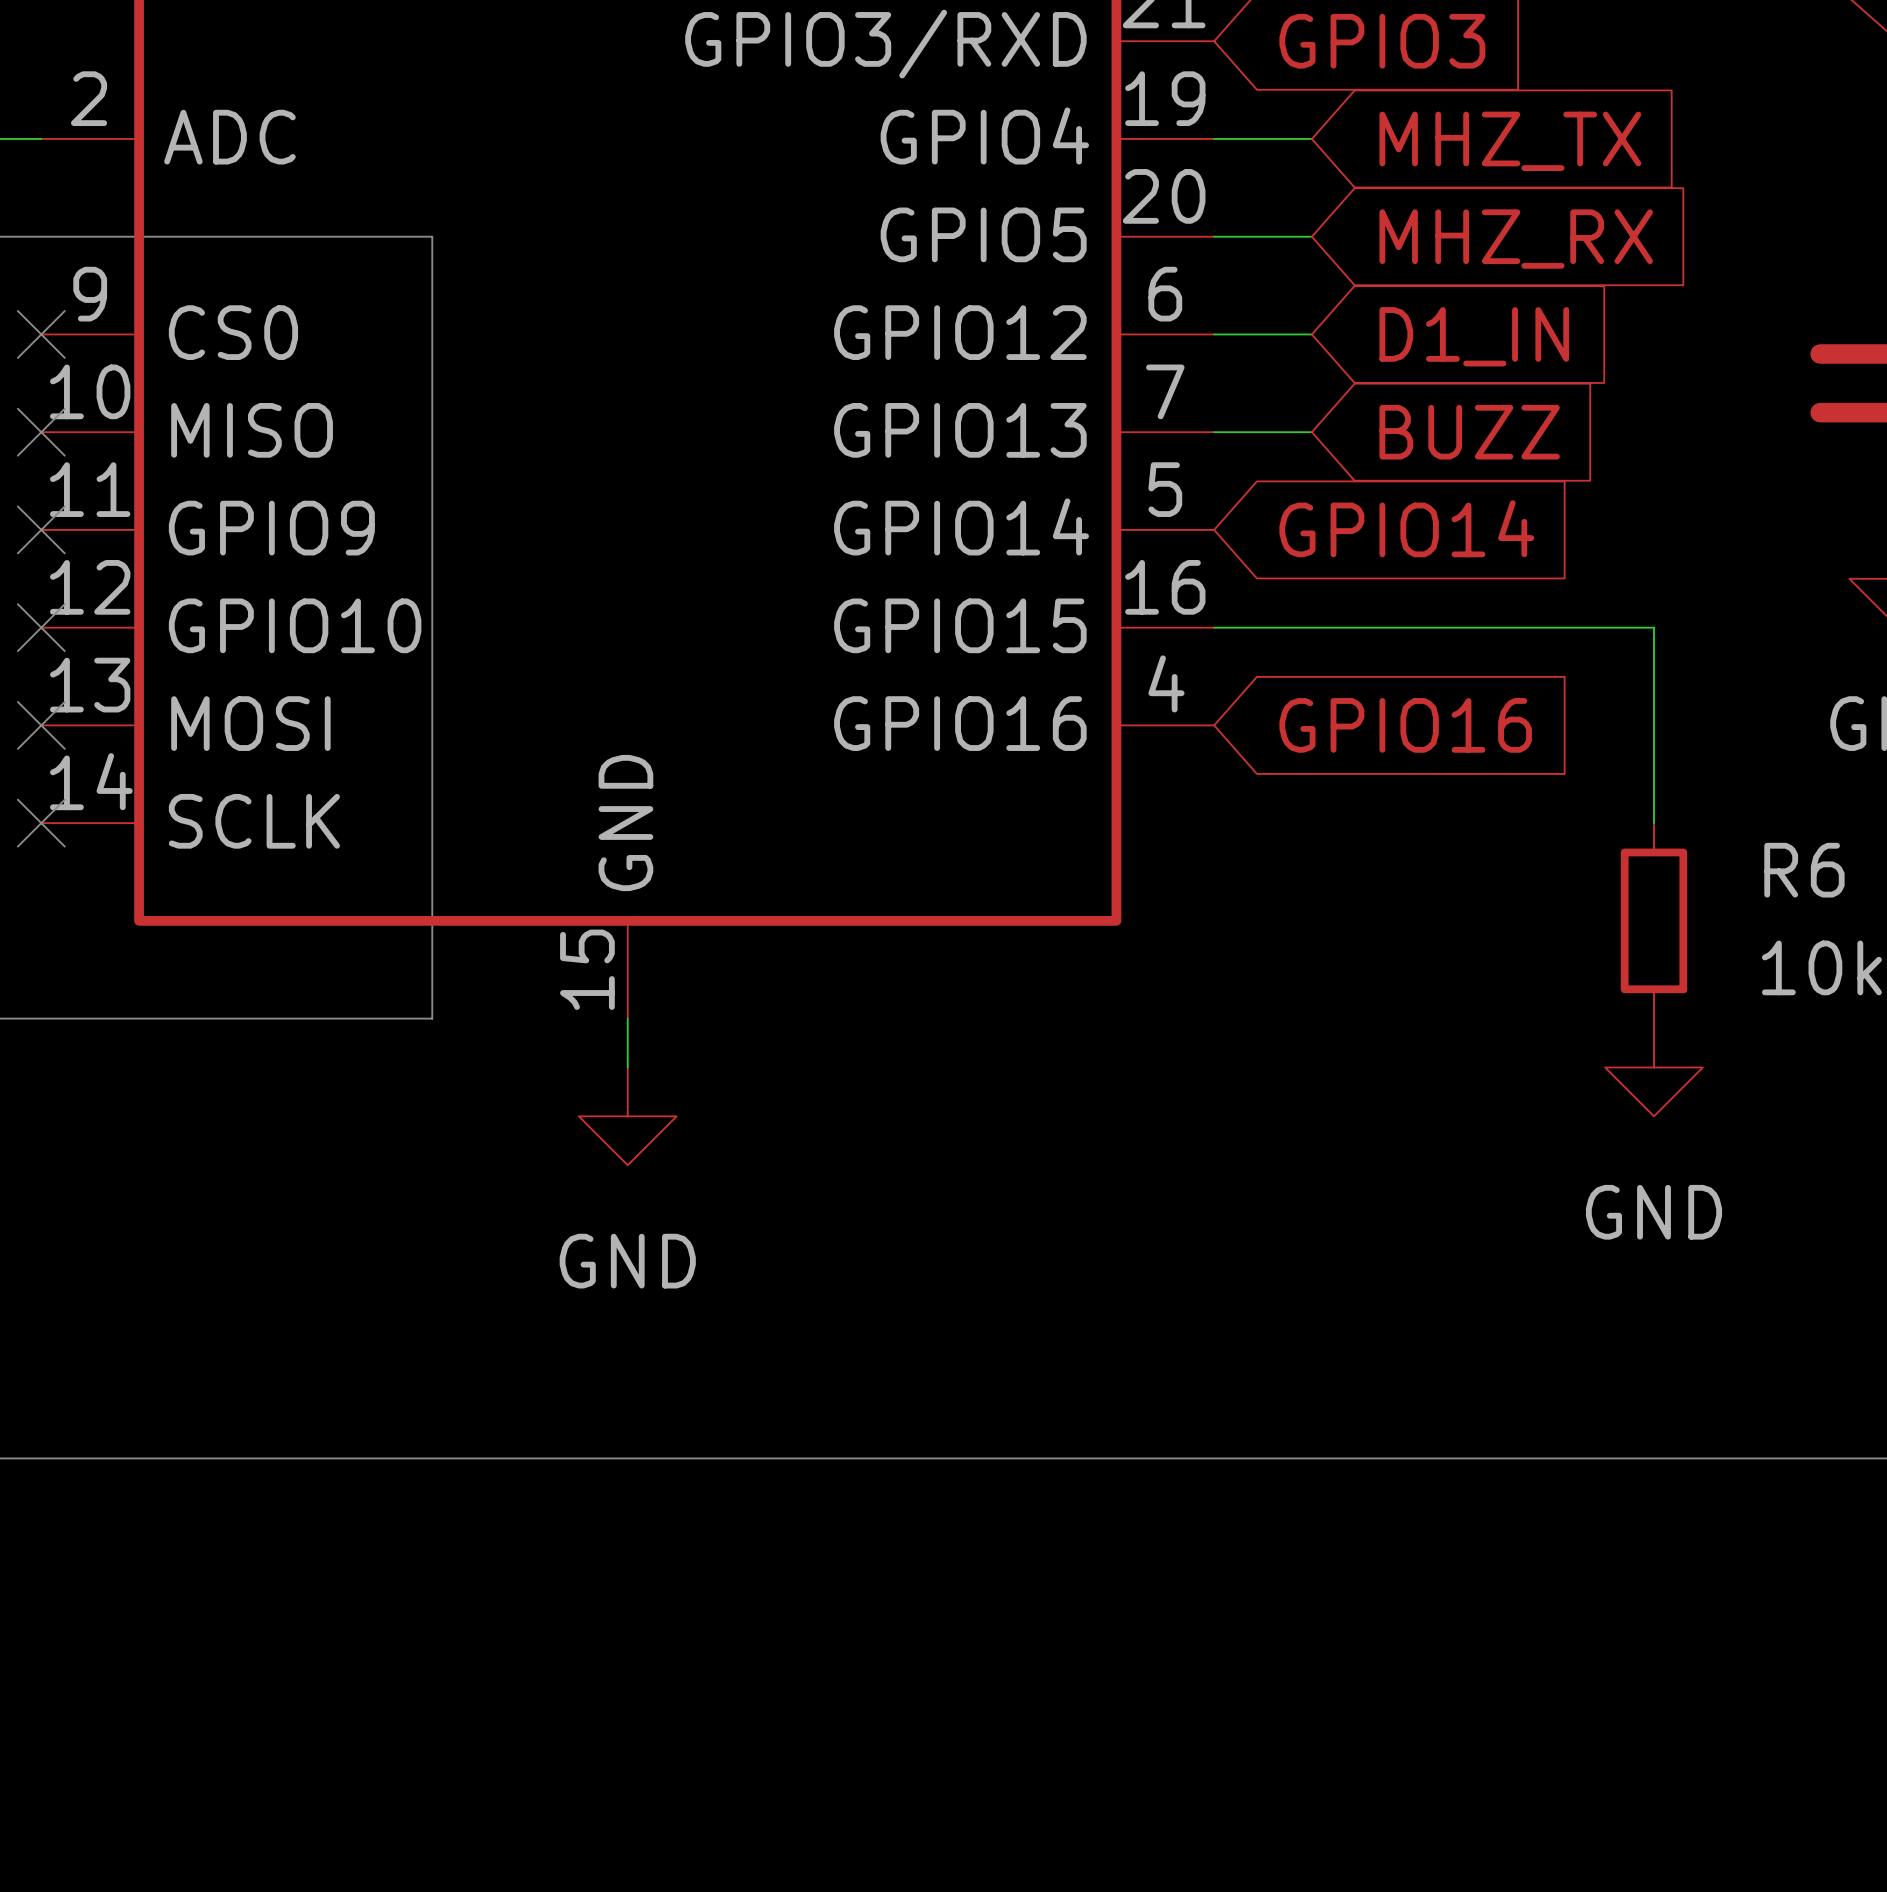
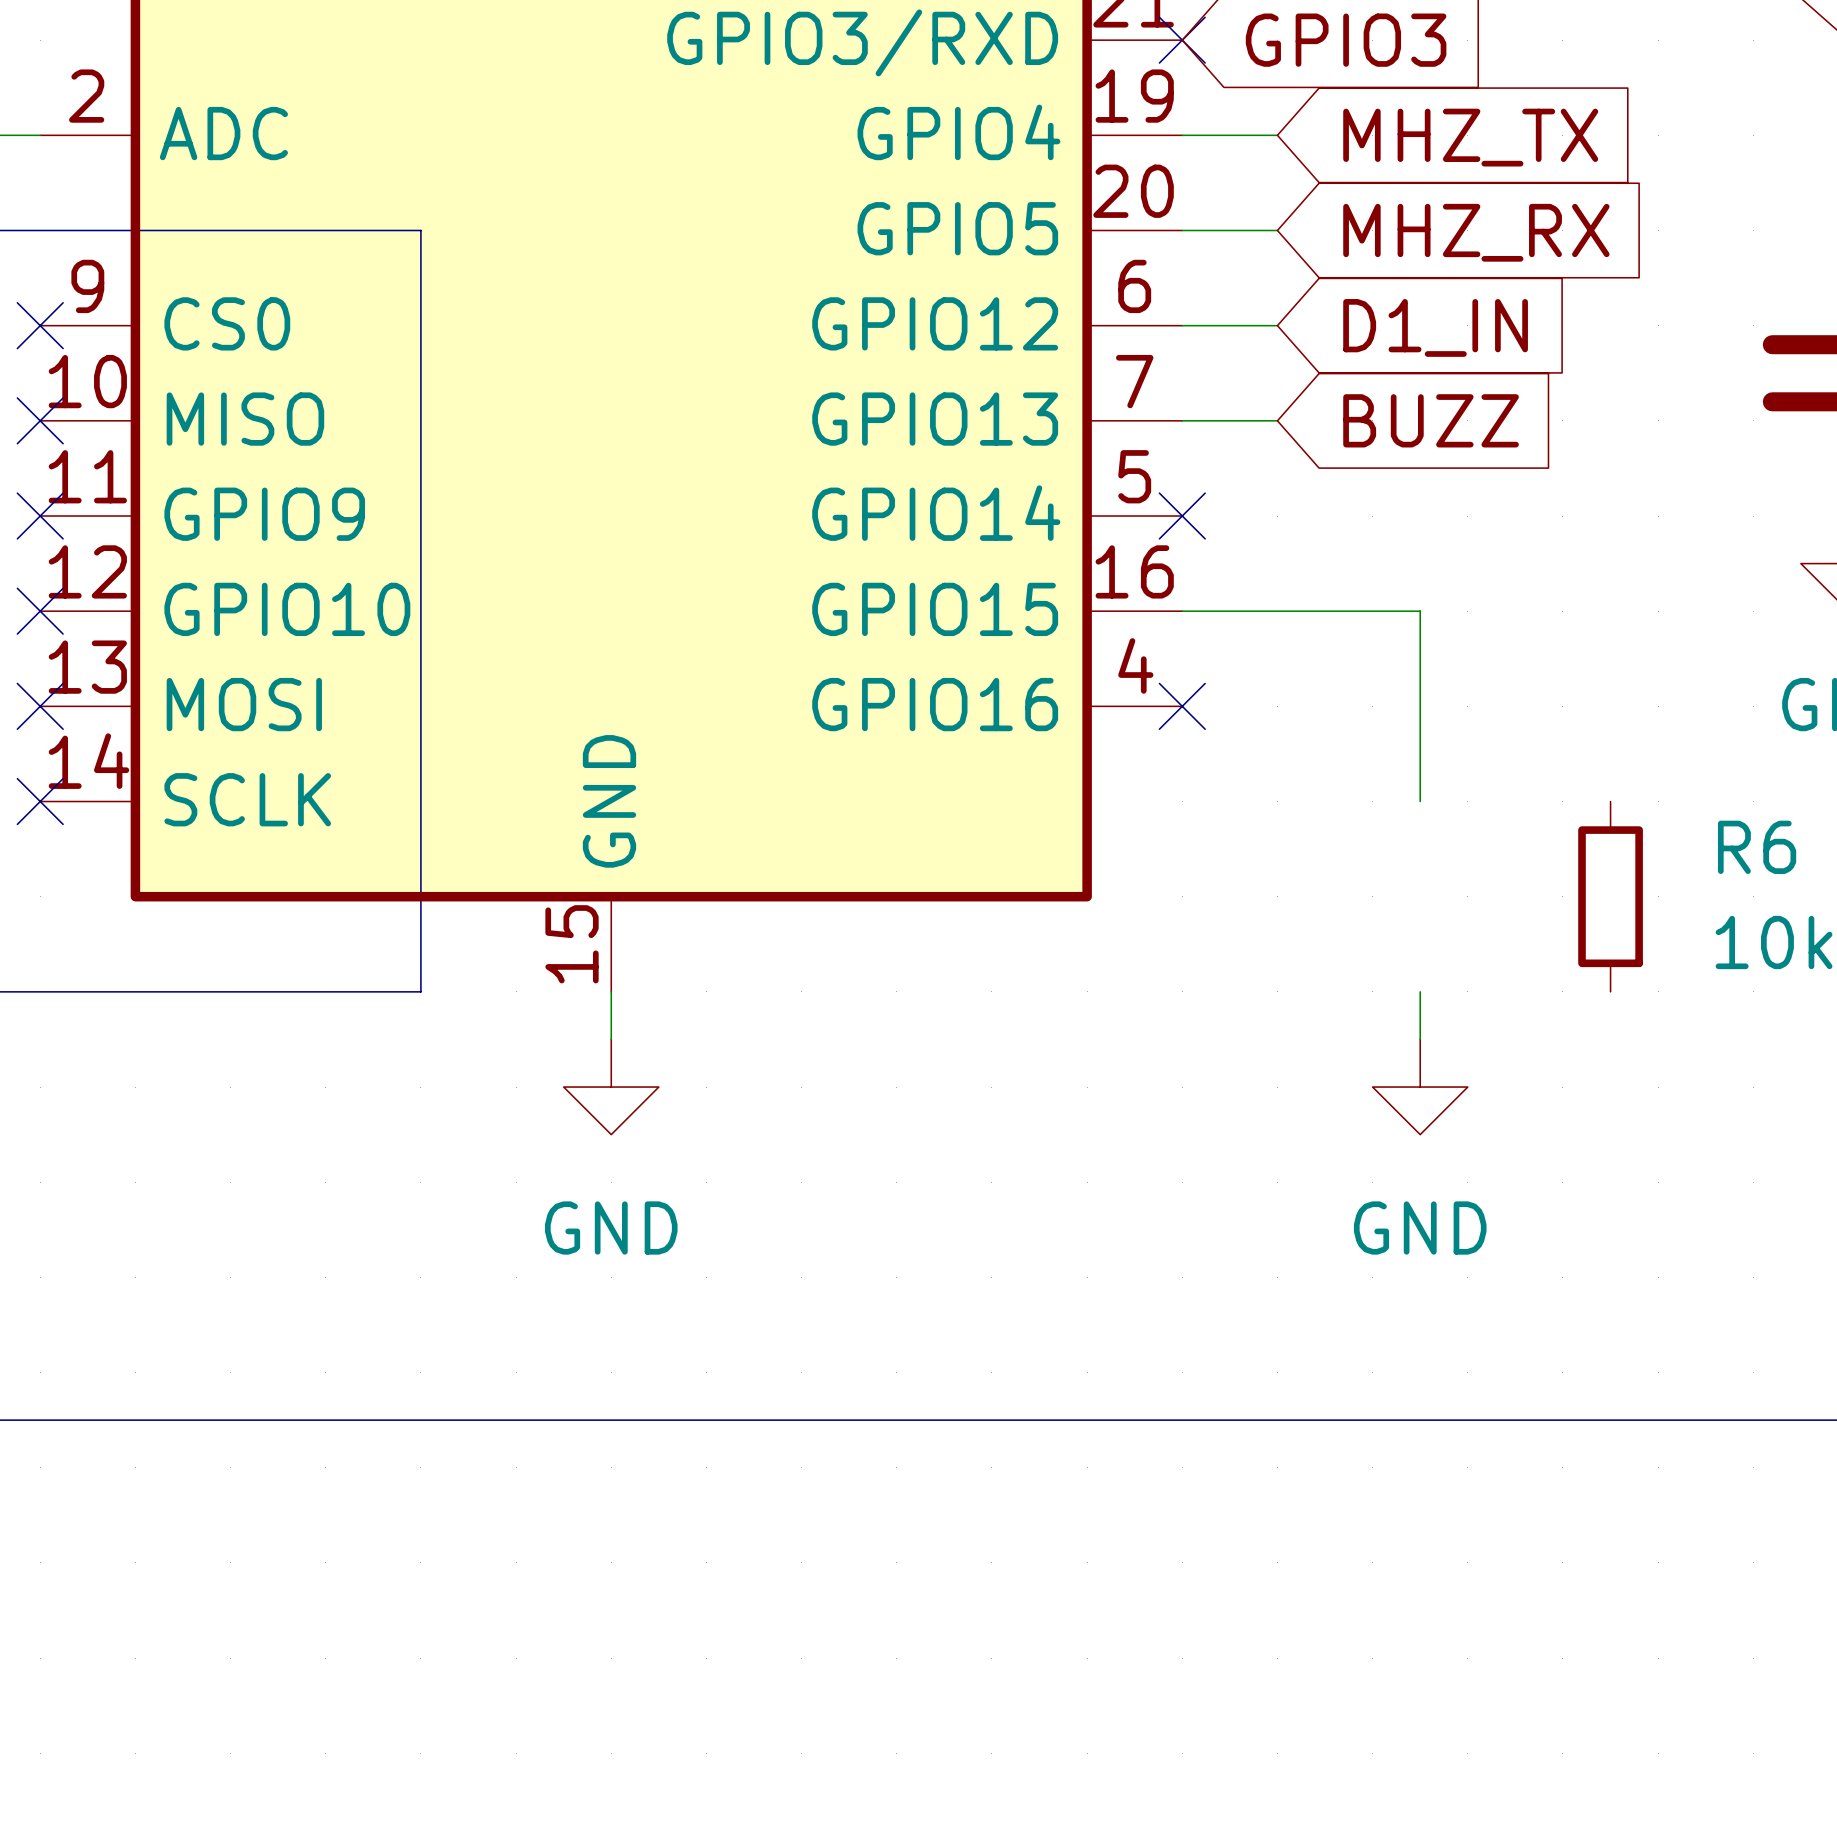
no-connect mark: none -> (1182, 40)
global label: GPIO14 (1406, 528) -> none
no-connect mark: none -> (1182, 516)
wire: (1458, 627) (1653, 627) (1653, 823) -> (1420, 611) (1420, 801)
no-connect mark: none -> (1182, 706)
global label: GPIO16 (1405, 725) -> none
wire: none -> (1420, 991) (1420, 1039)
power symbol position: GND (1653, 1067) -> GND (1420, 1087)

